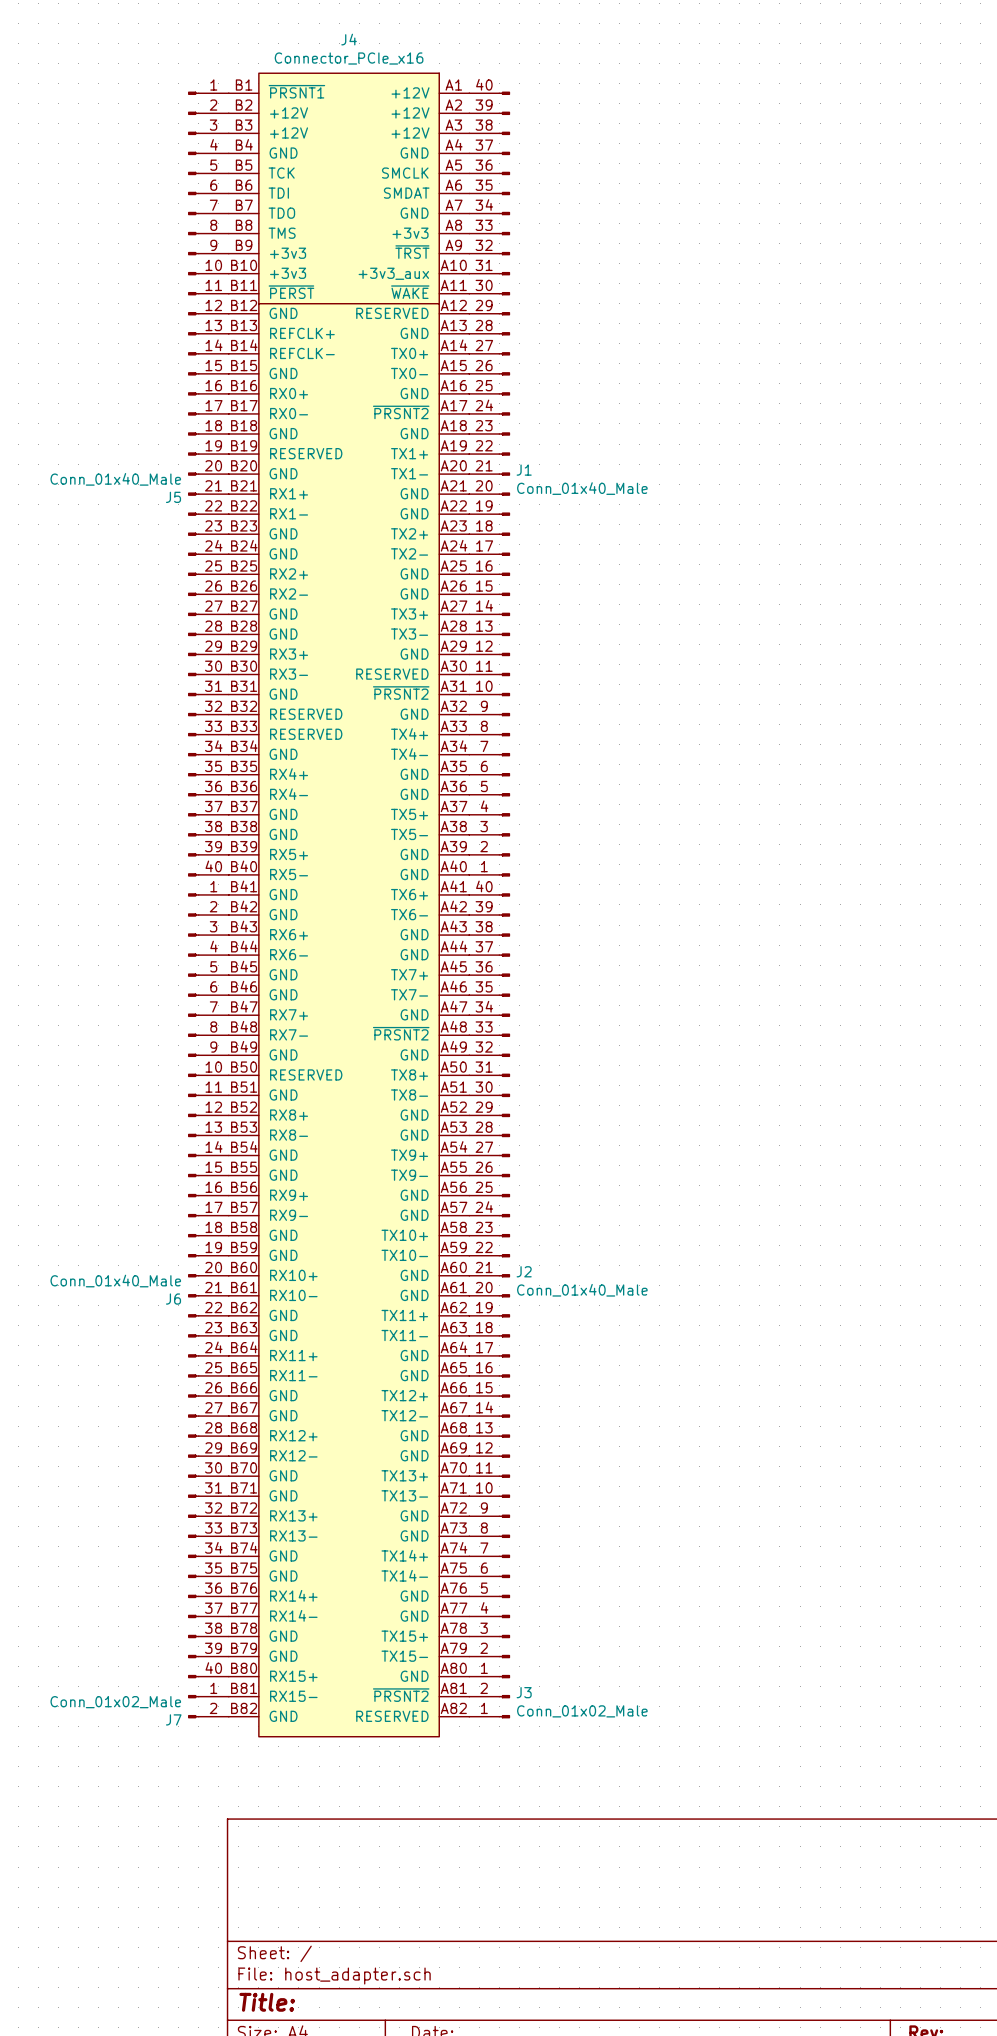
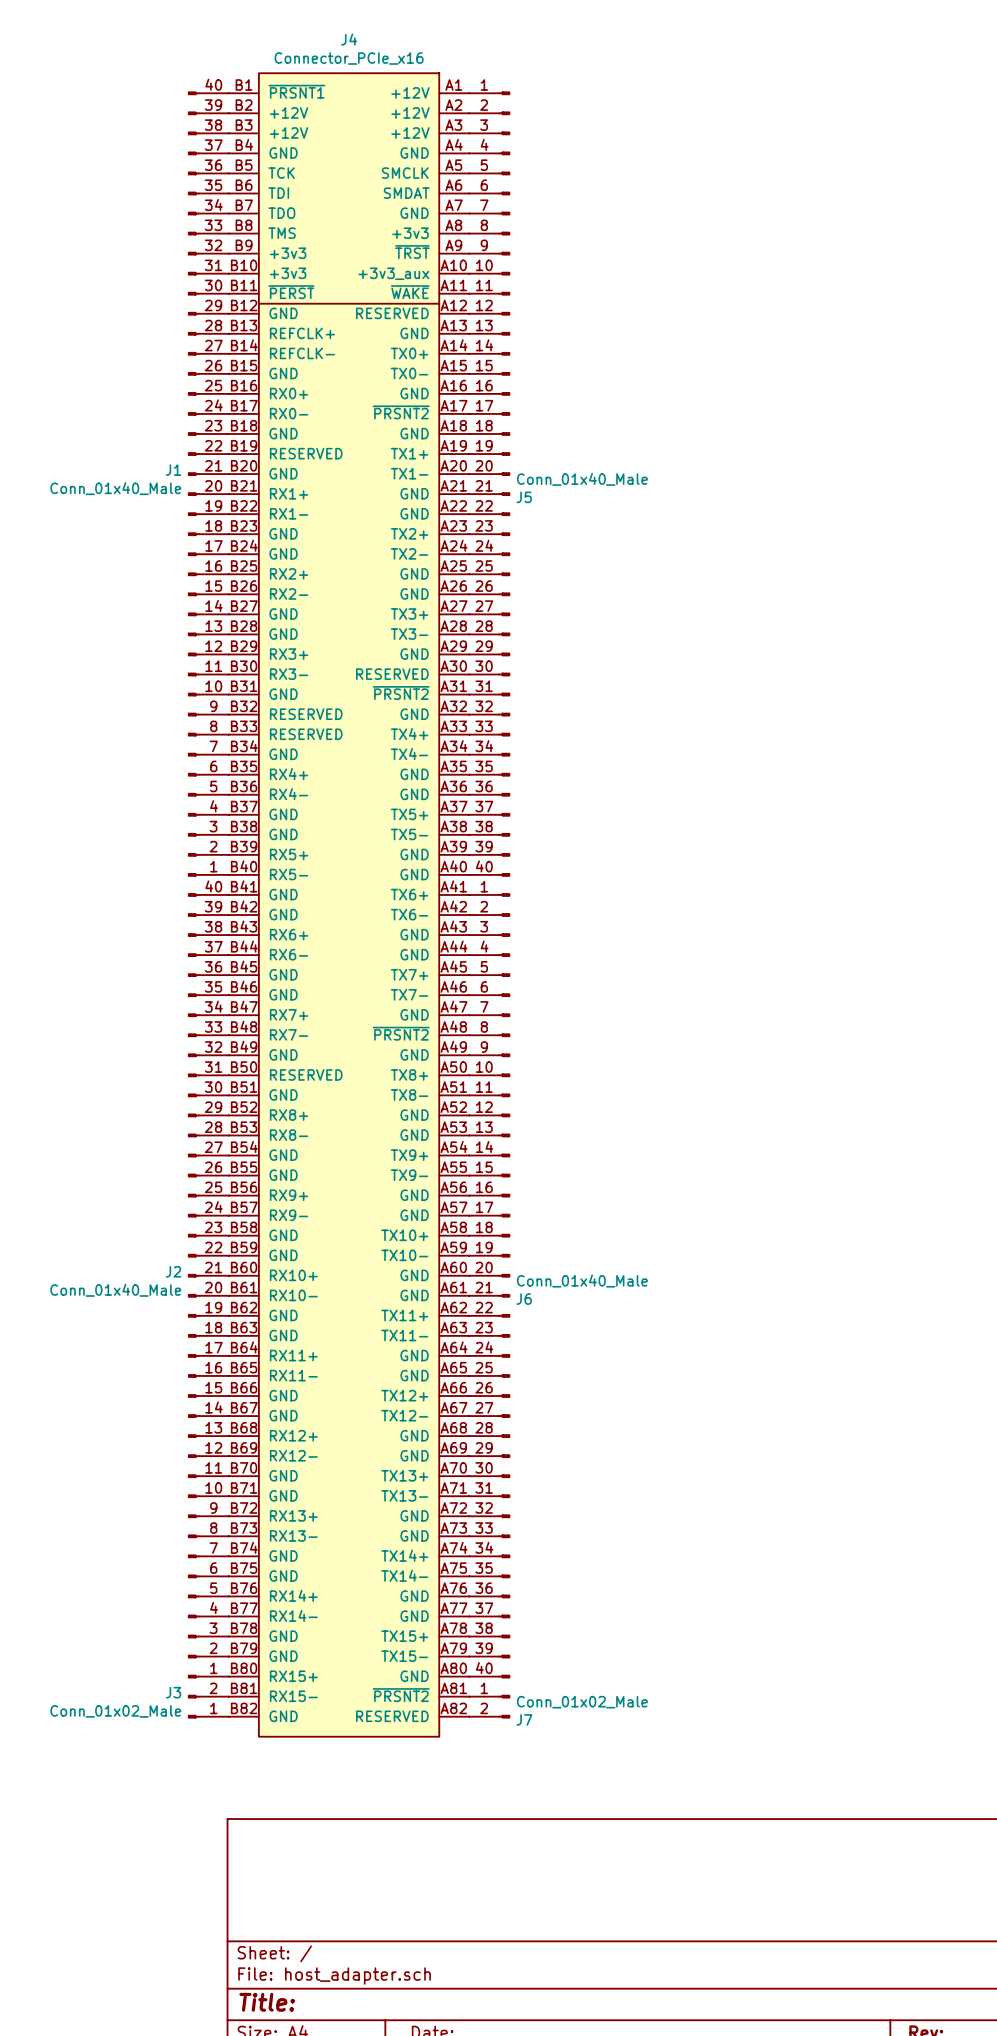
J5 flip: as is (193, 484) -> left-right (504, 484)
J1 flip: as is (504, 484) -> left-right (193, 484)
J6 flip: as is (193, 1285) -> left-right (504, 1285)
J2 flip: as is (504, 1285) -> left-right (193, 1285)
J7 flip: as is (193, 1706) -> left-right (504, 1706)
J7 position: (208, 1706) -> (489, 1706)
J3 position: (489, 1706) -> (208, 1706)
J3 flip: as is (504, 1706) -> left-right (193, 1706)

